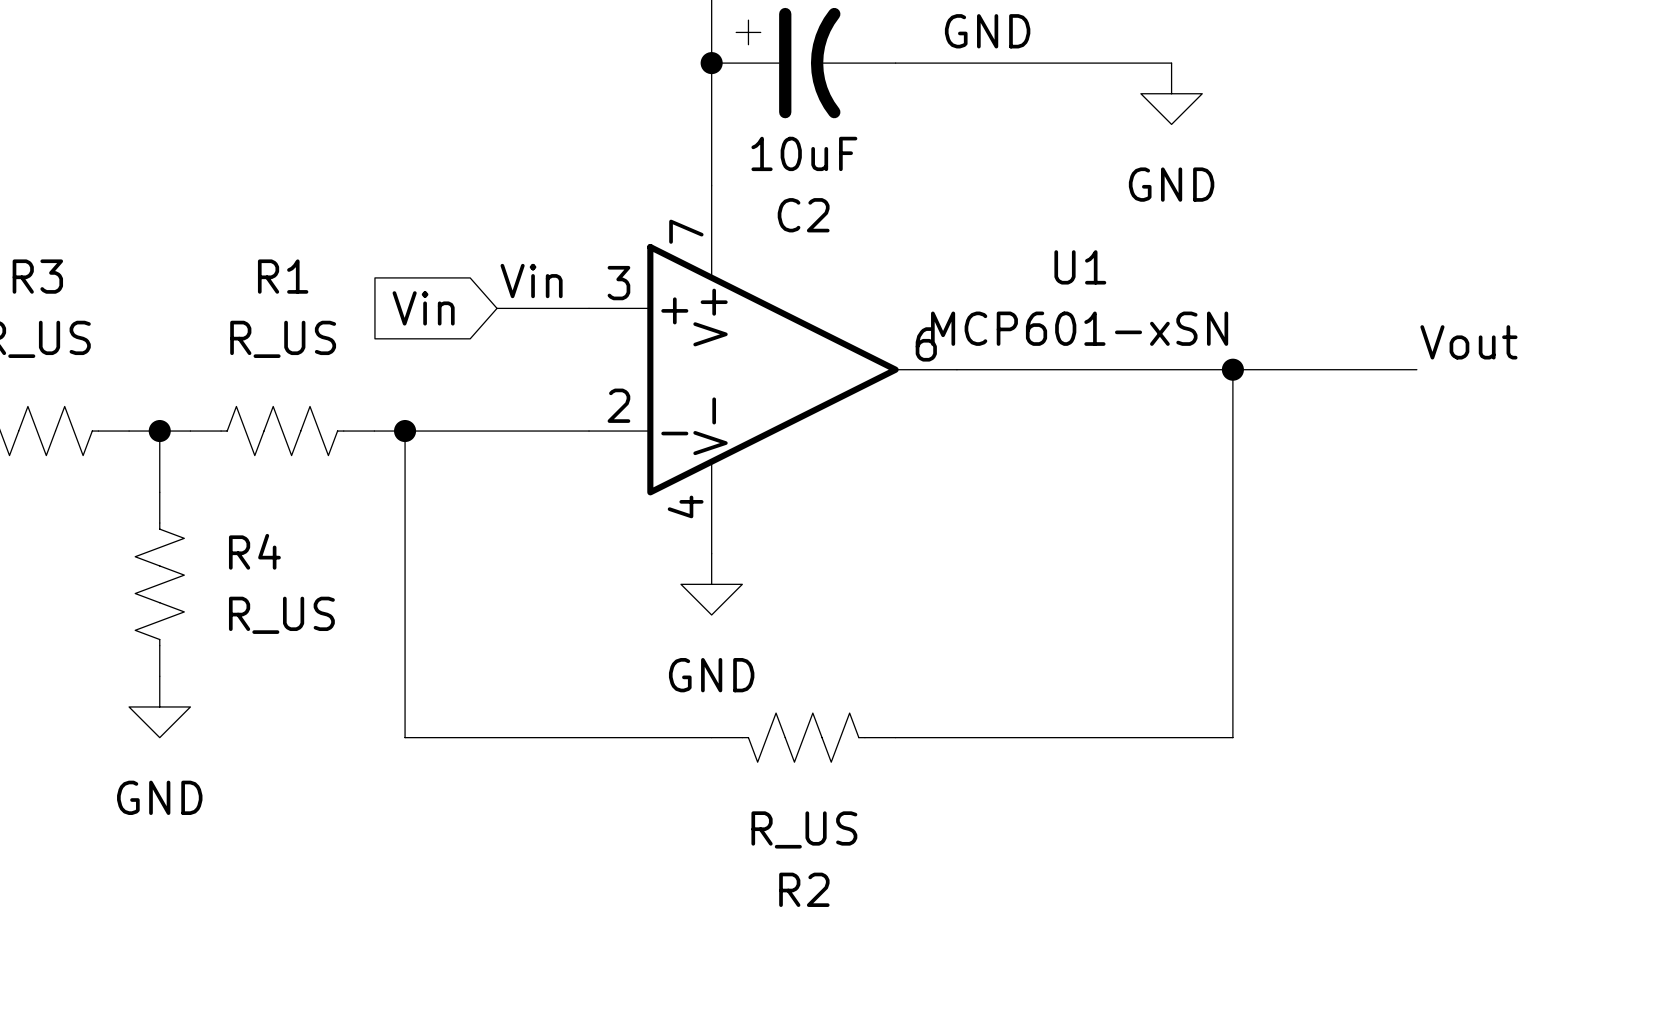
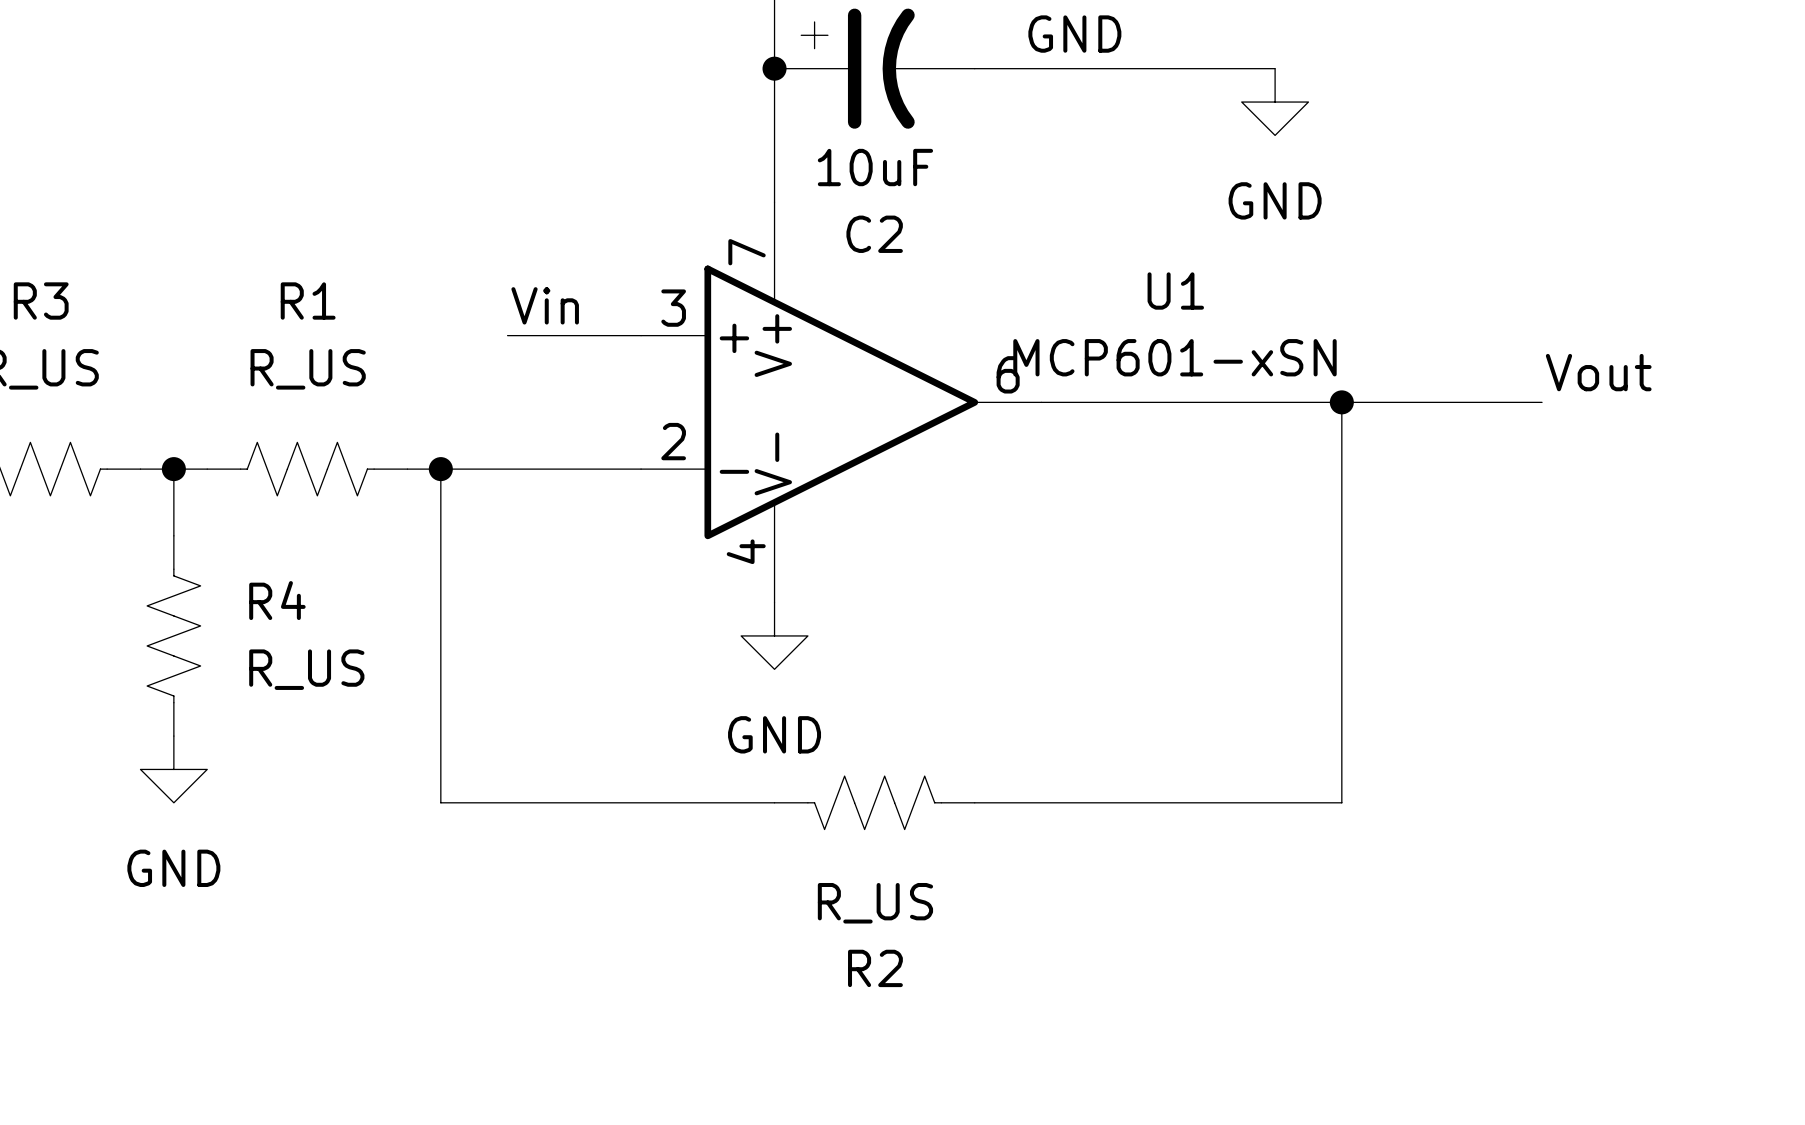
label position: Vin (531, 281) -> Vin (545, 305)
global label: Vin (423, 308) -> none
wire: none -> (507, 335) (540, 335)

